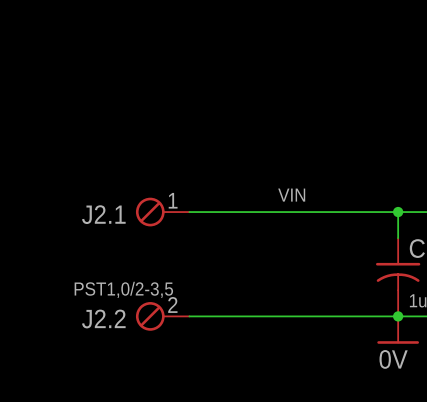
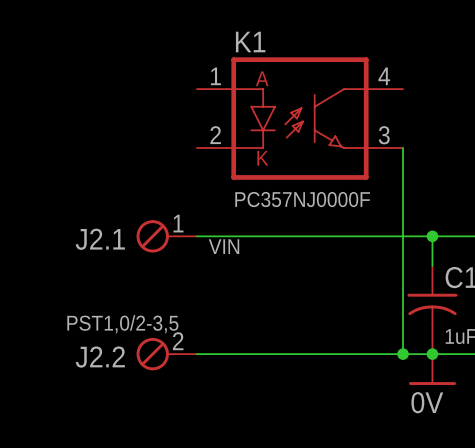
K1: none -> PC357NJ0000F (299, 118)
wire: none -> (403, 148) (403, 354)
label position: VIN (291, 195) -> VIN (223, 246)
junction: none -> (403, 354)

